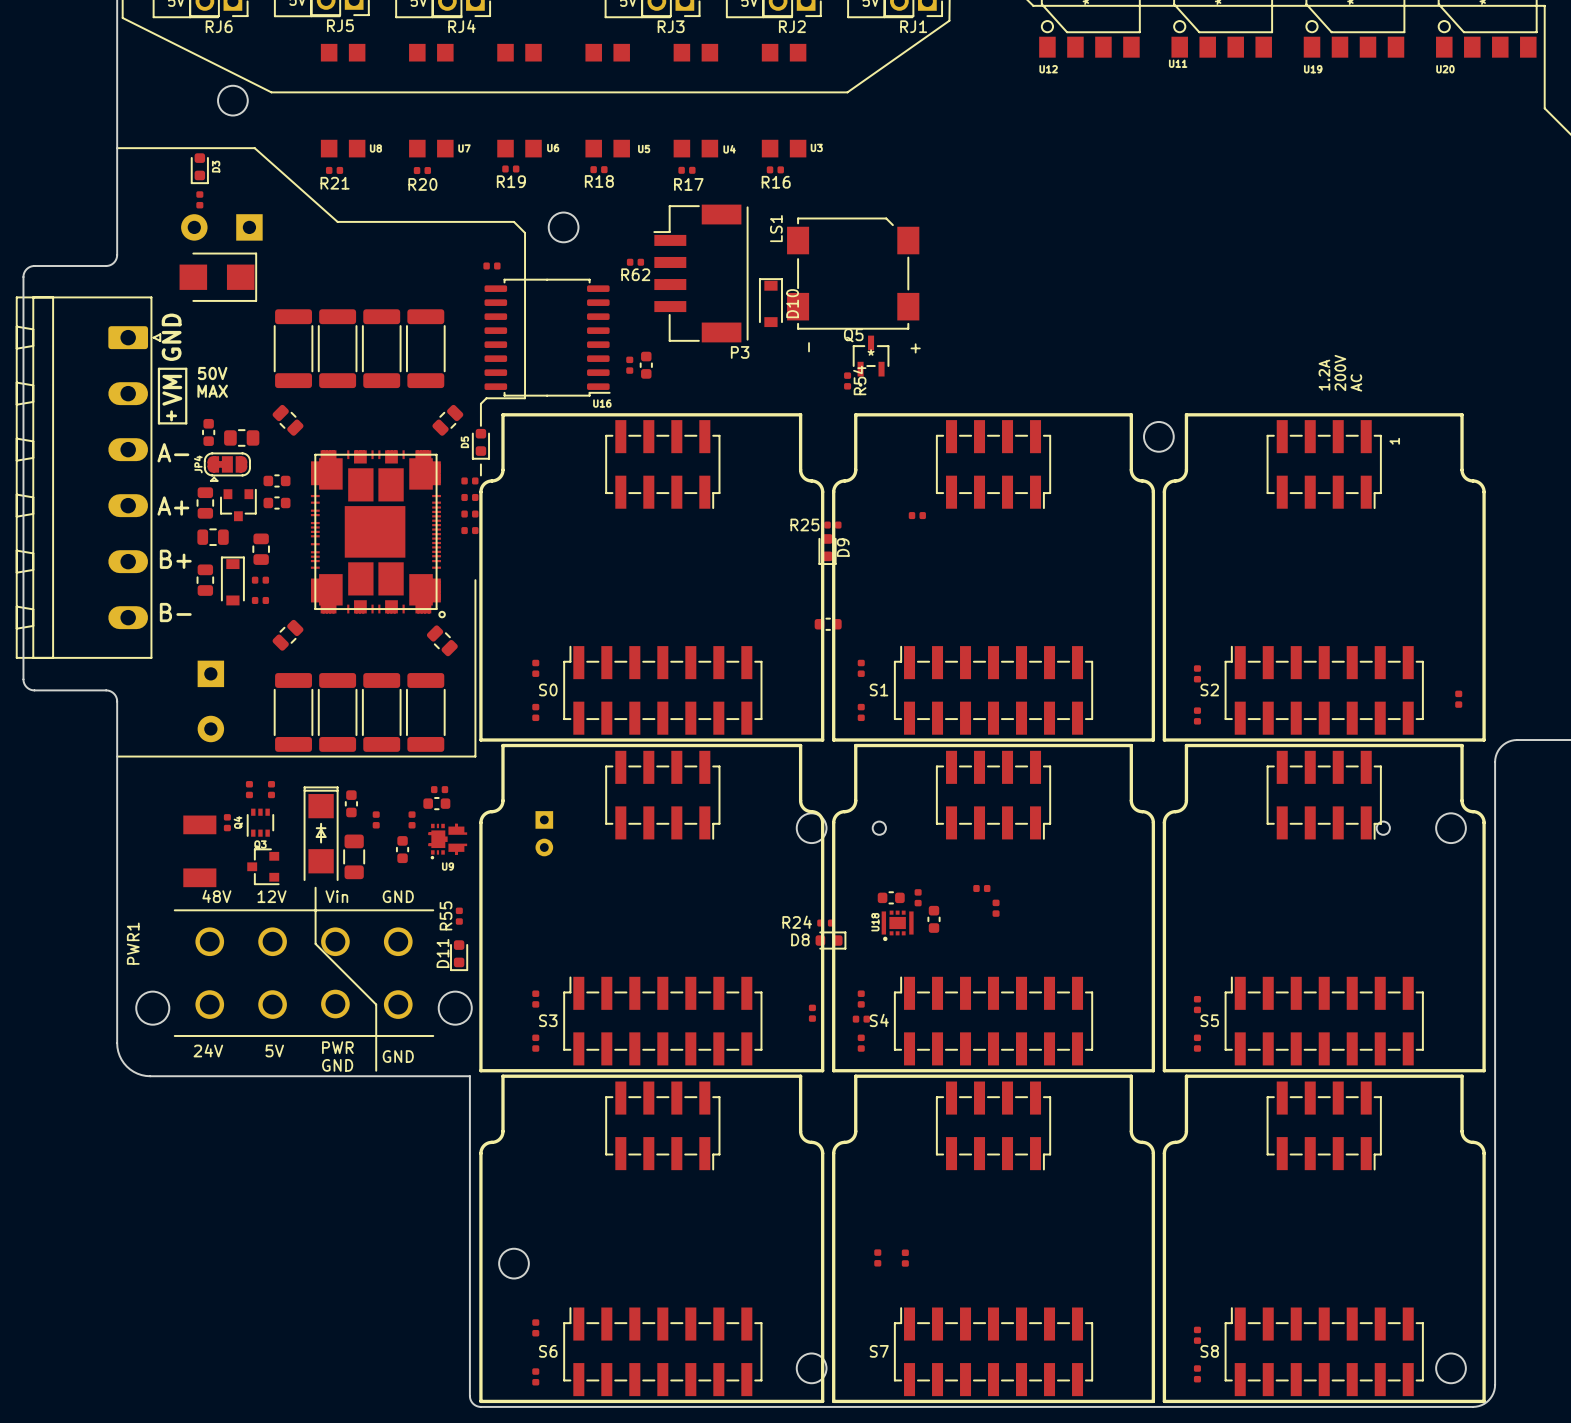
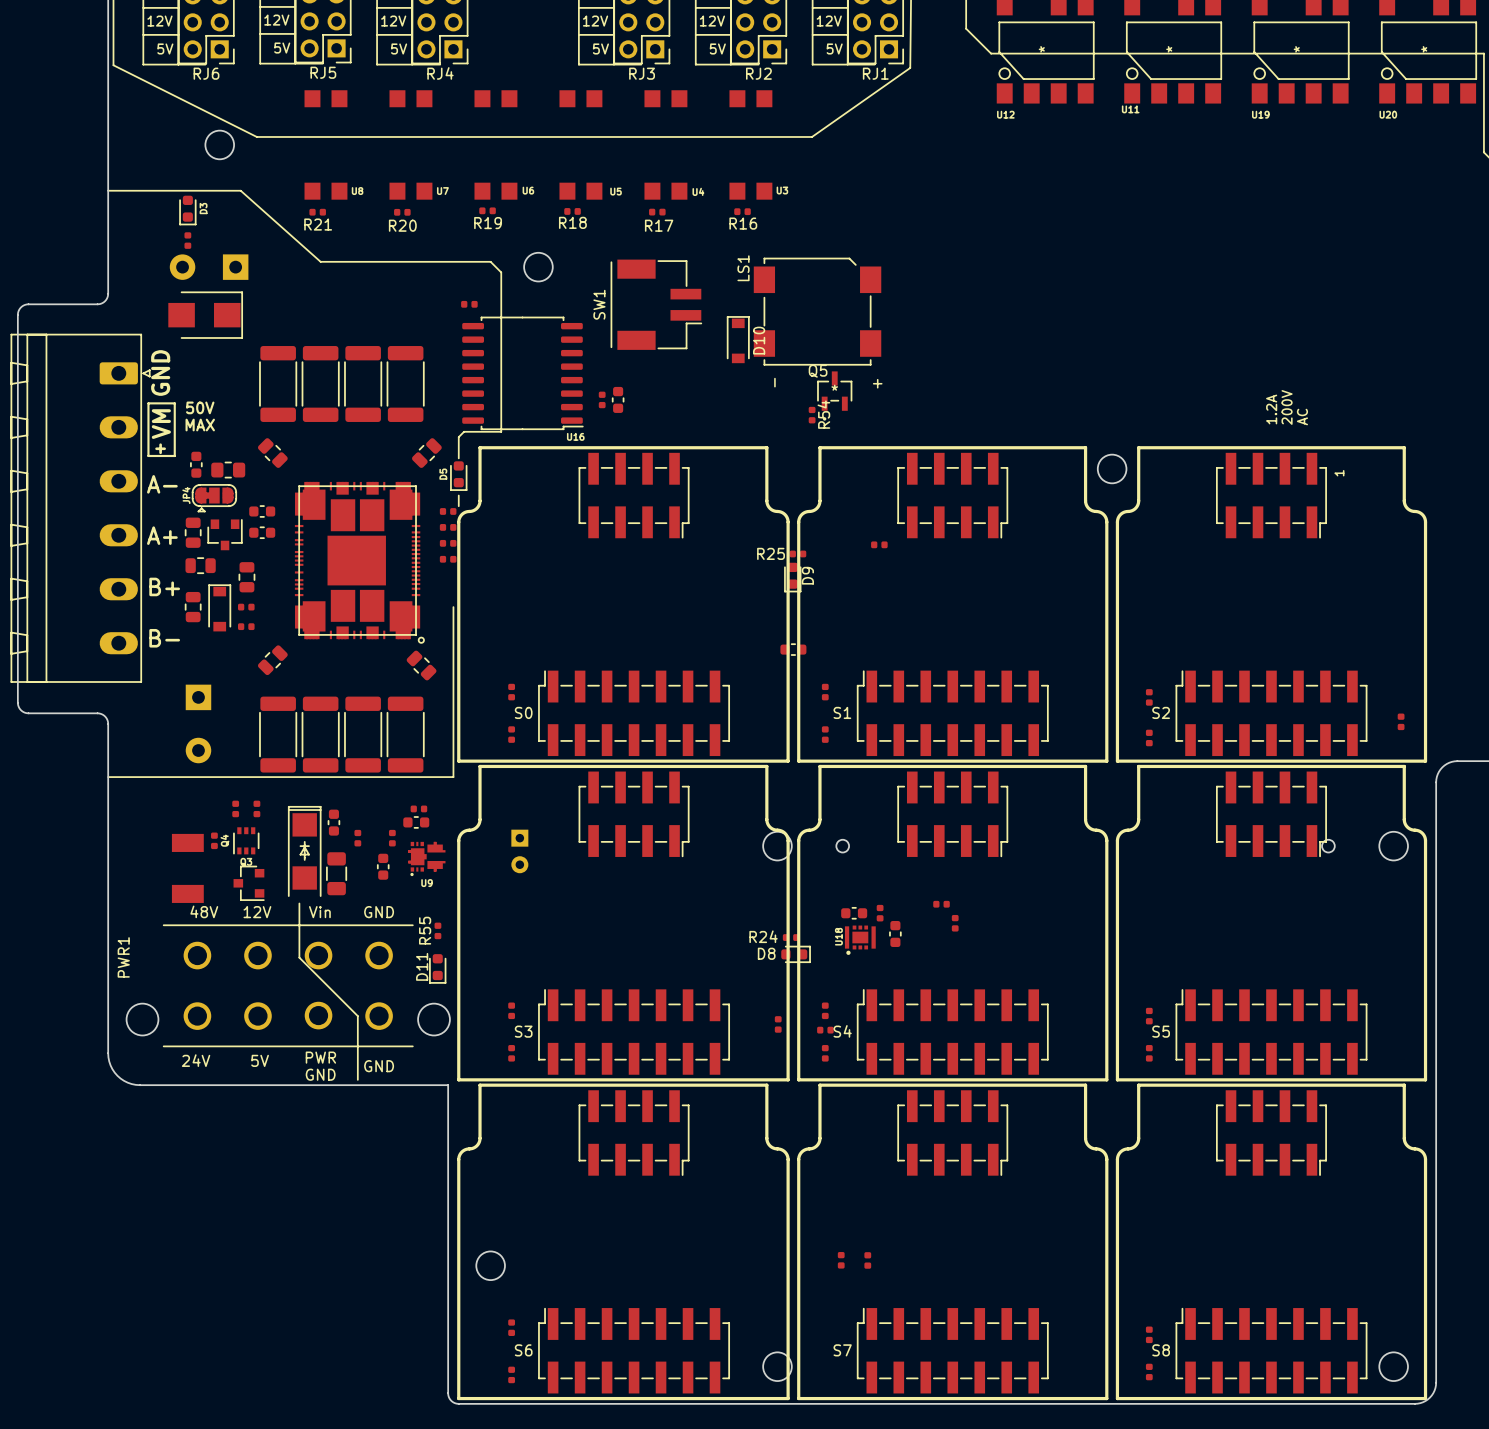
R62: (635, 262) -> none
SW1: none -> (656, 304)
P3: (700, 273) -> none

